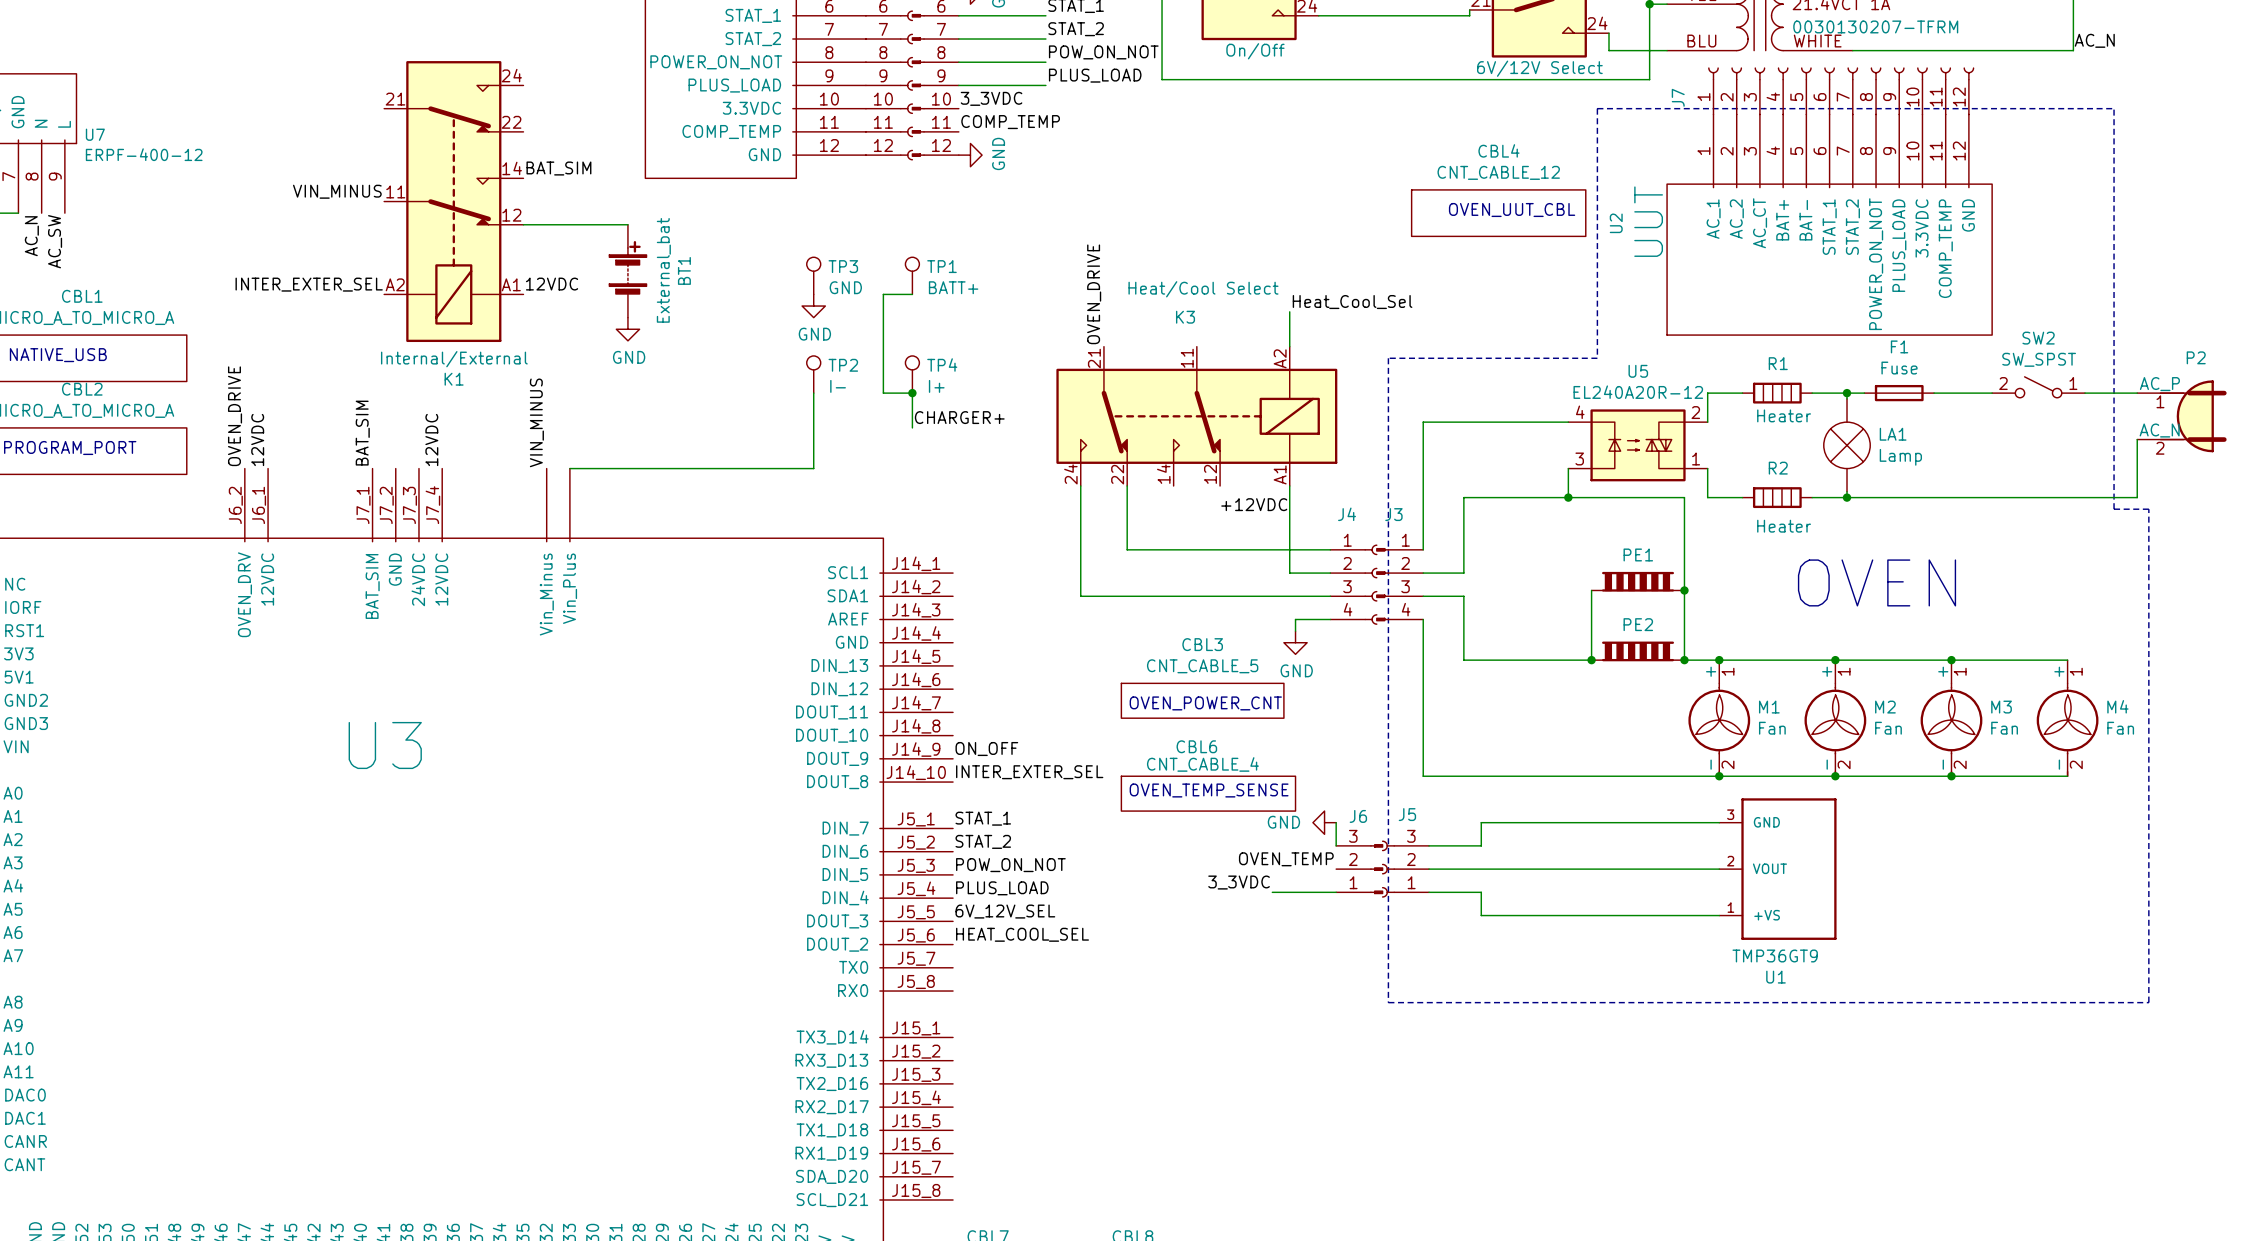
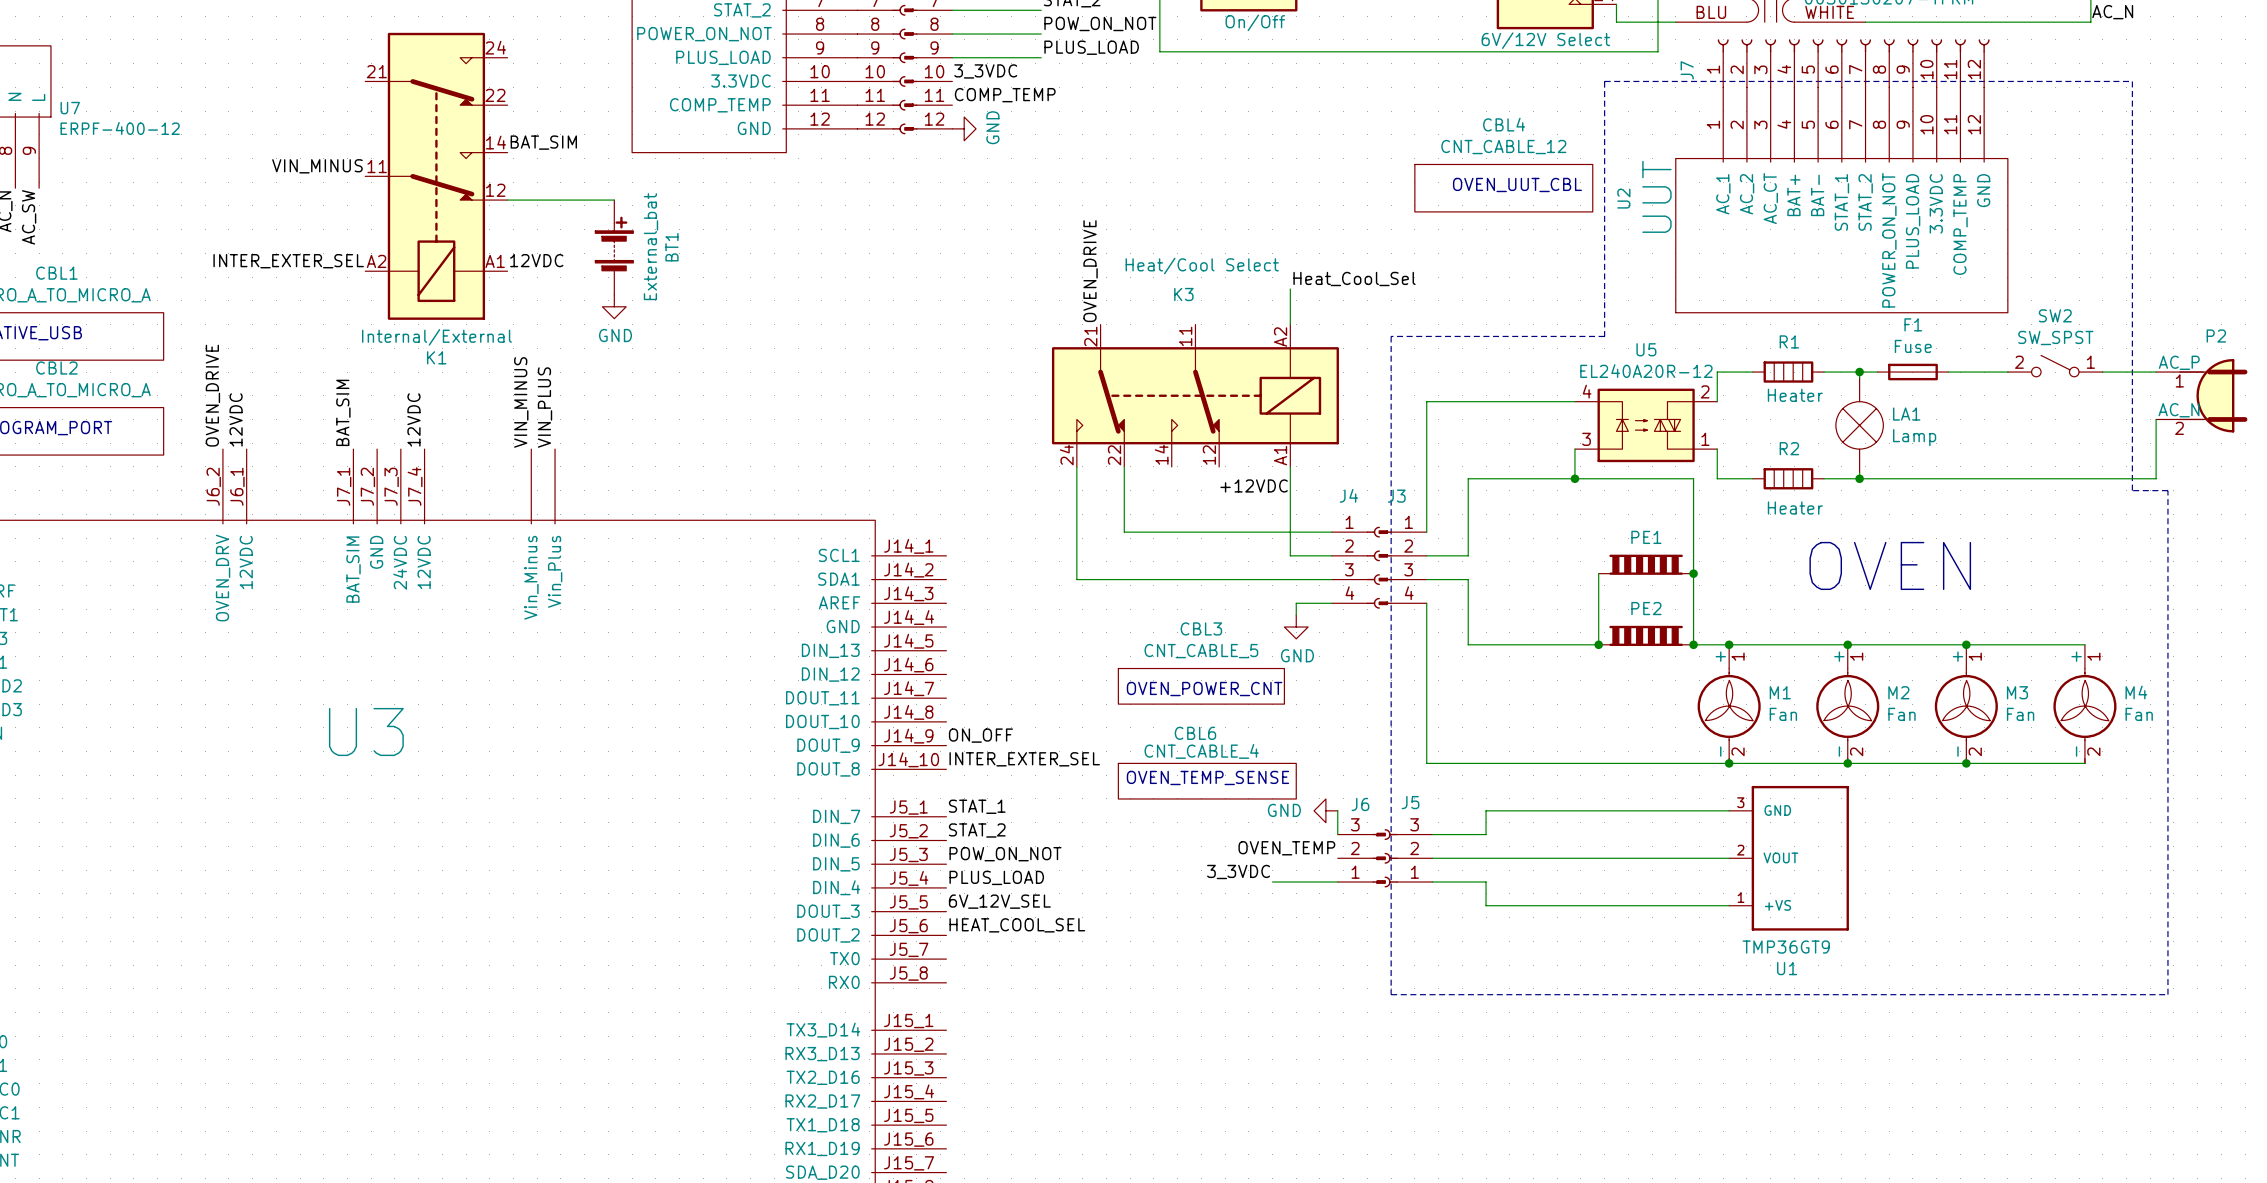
TP3: GND (813, 275) -> none
TP1: BATT+ (912, 275) -> none
wire: (912, 294) (883, 294) (883, 393) (912, 393) (912, 427) -> none
power symbol: GND (813, 306) -> none
TP2: I- (813, 374) -> none
TP4: I+ (912, 374) -> none
wire: (813, 393) (813, 468) (569, 468) -> none
junction: (912, 393) -> none
label: CHARGER+ (959, 417) -> none
label: none -> VIN_PLUS (545, 407)

